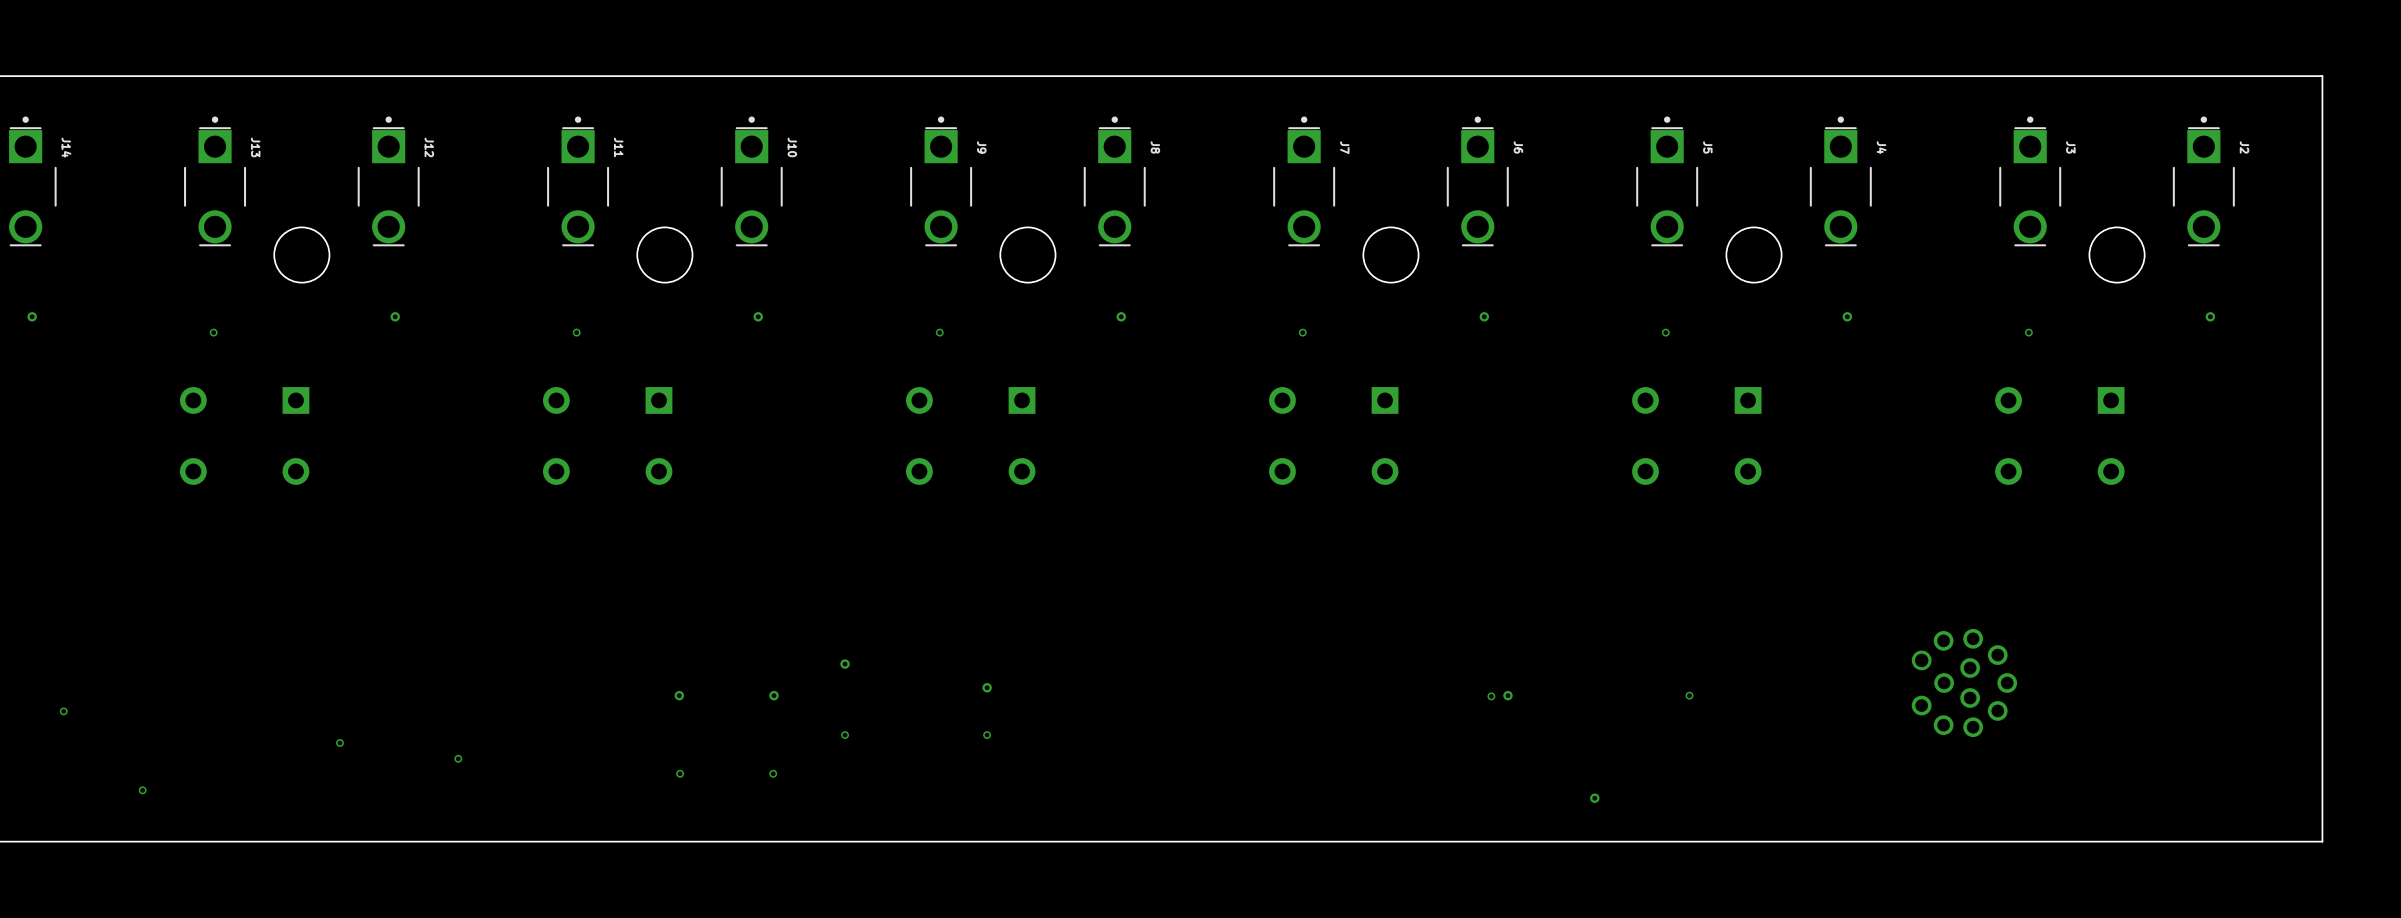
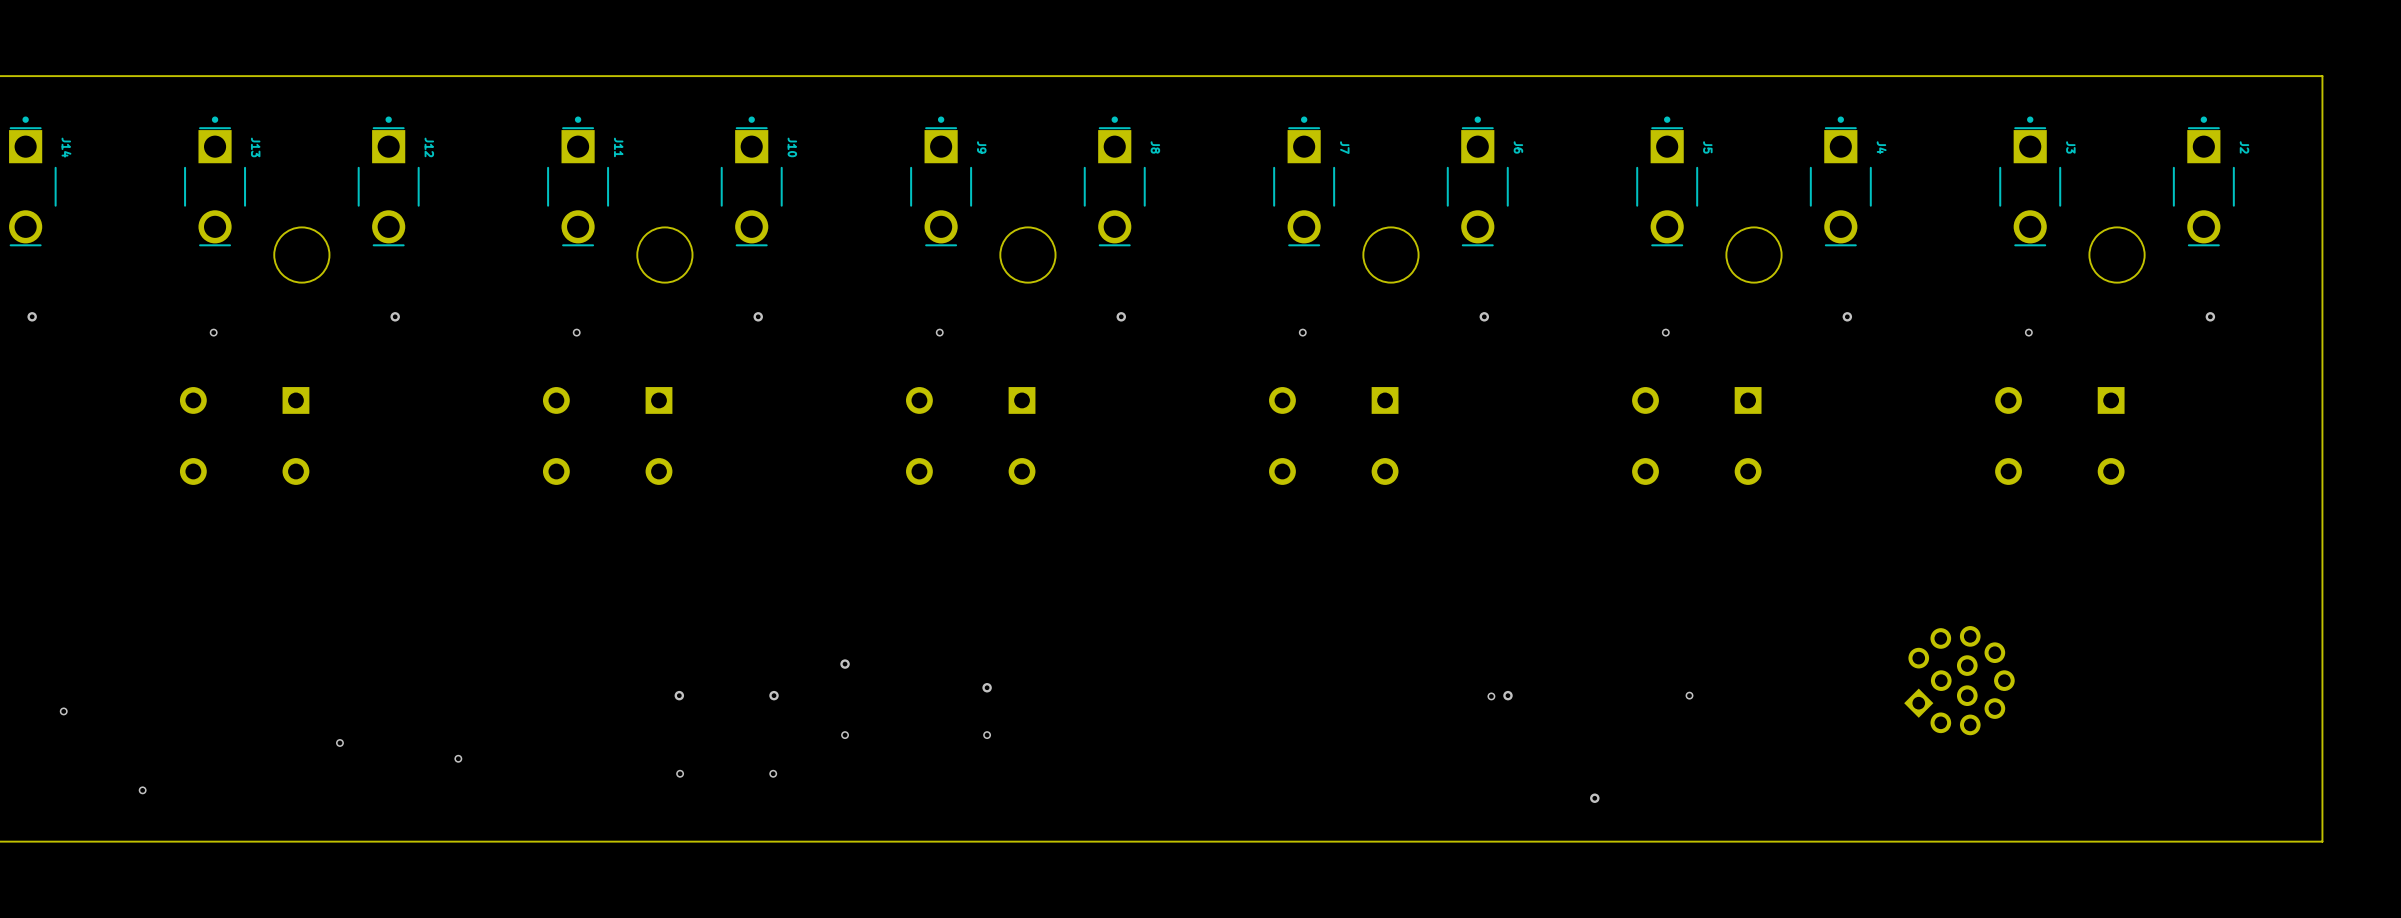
part footprint: [1911, 628, 2018, 738] -> [1904, 626, 2015, 736]

